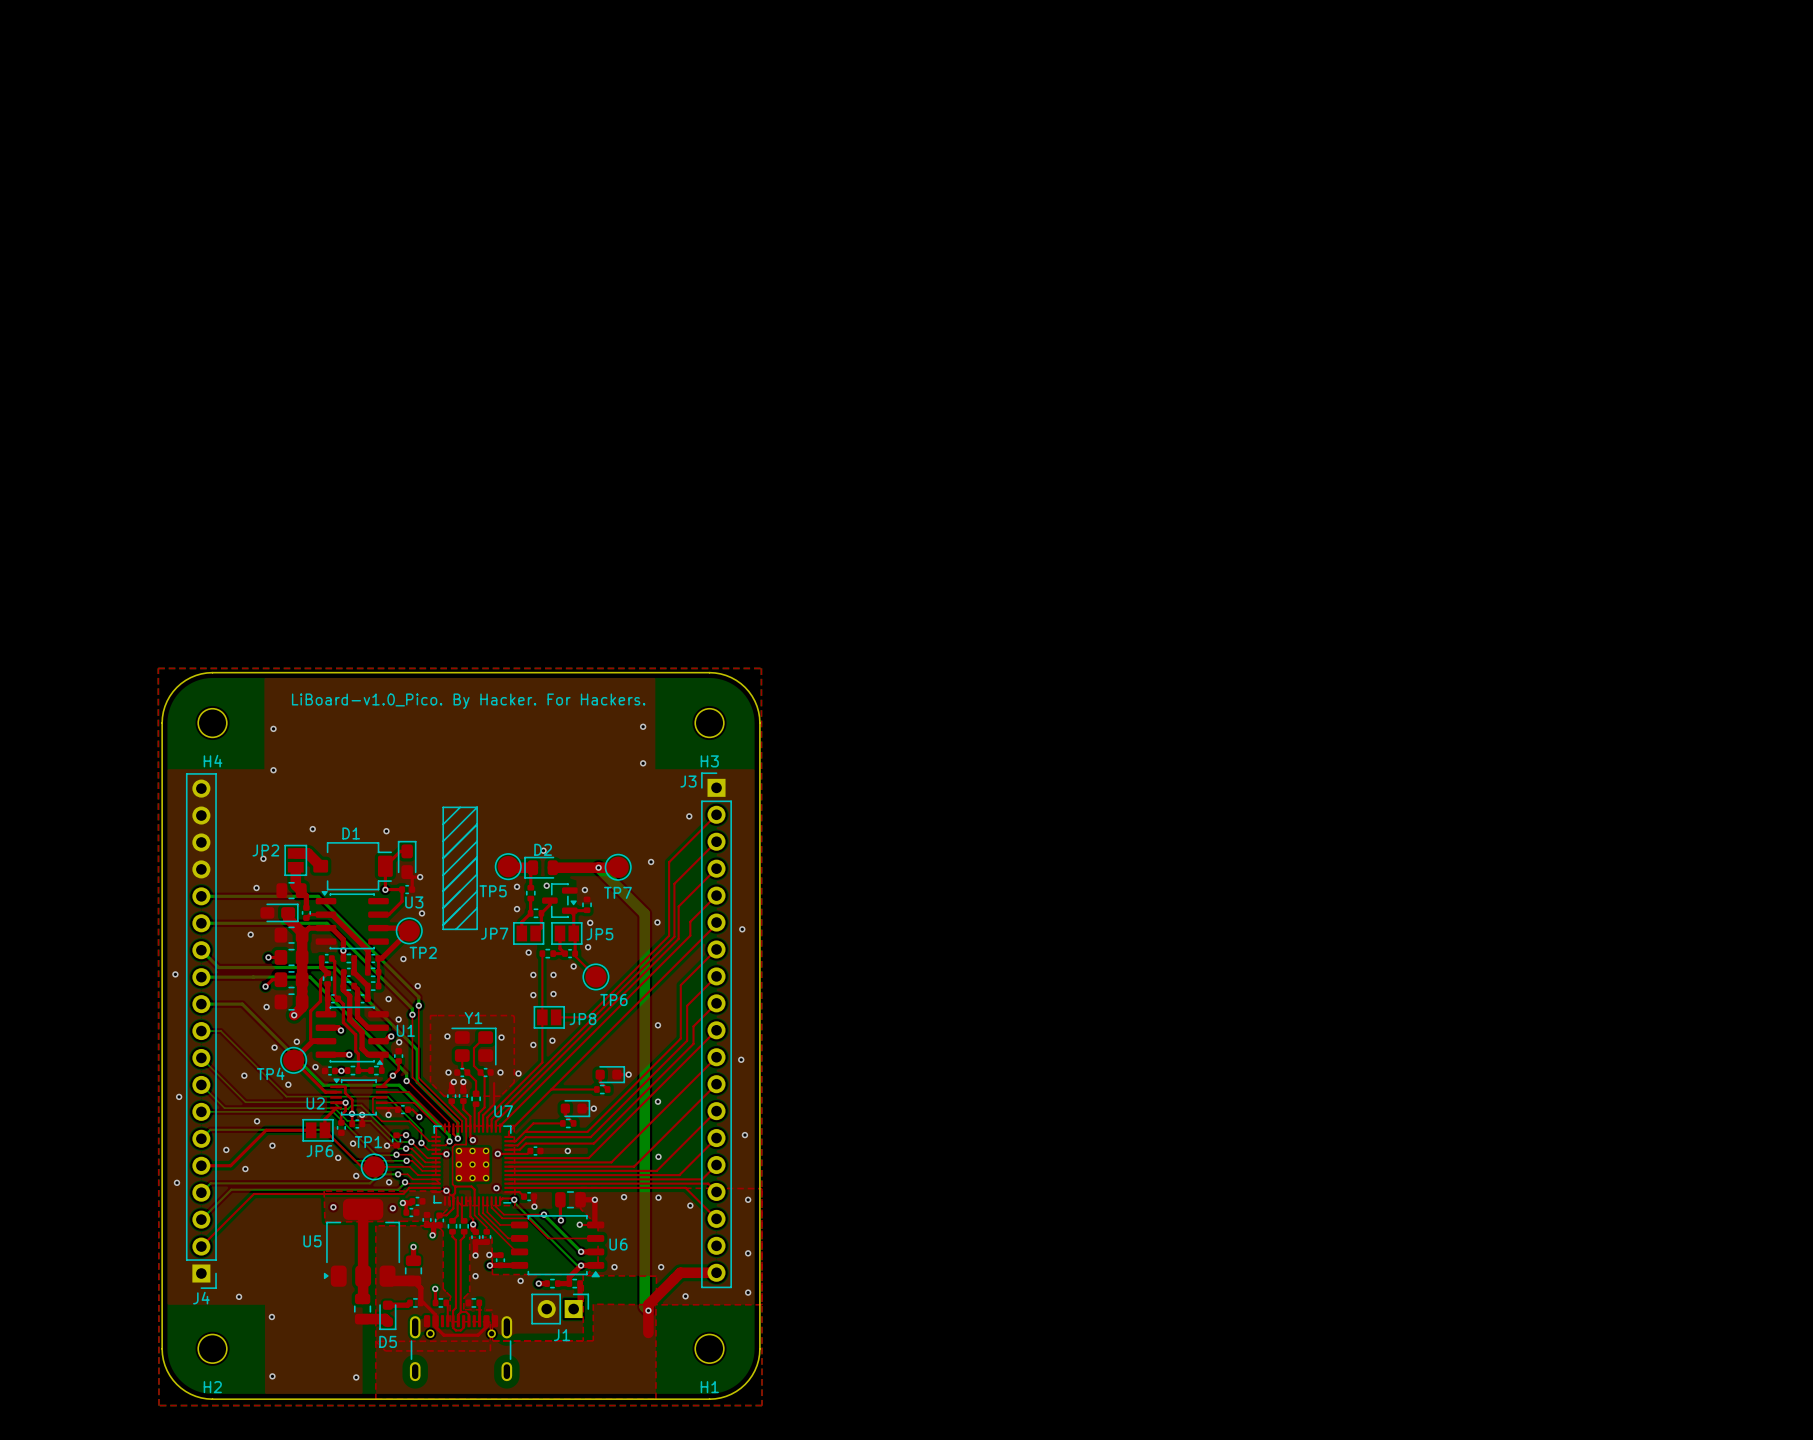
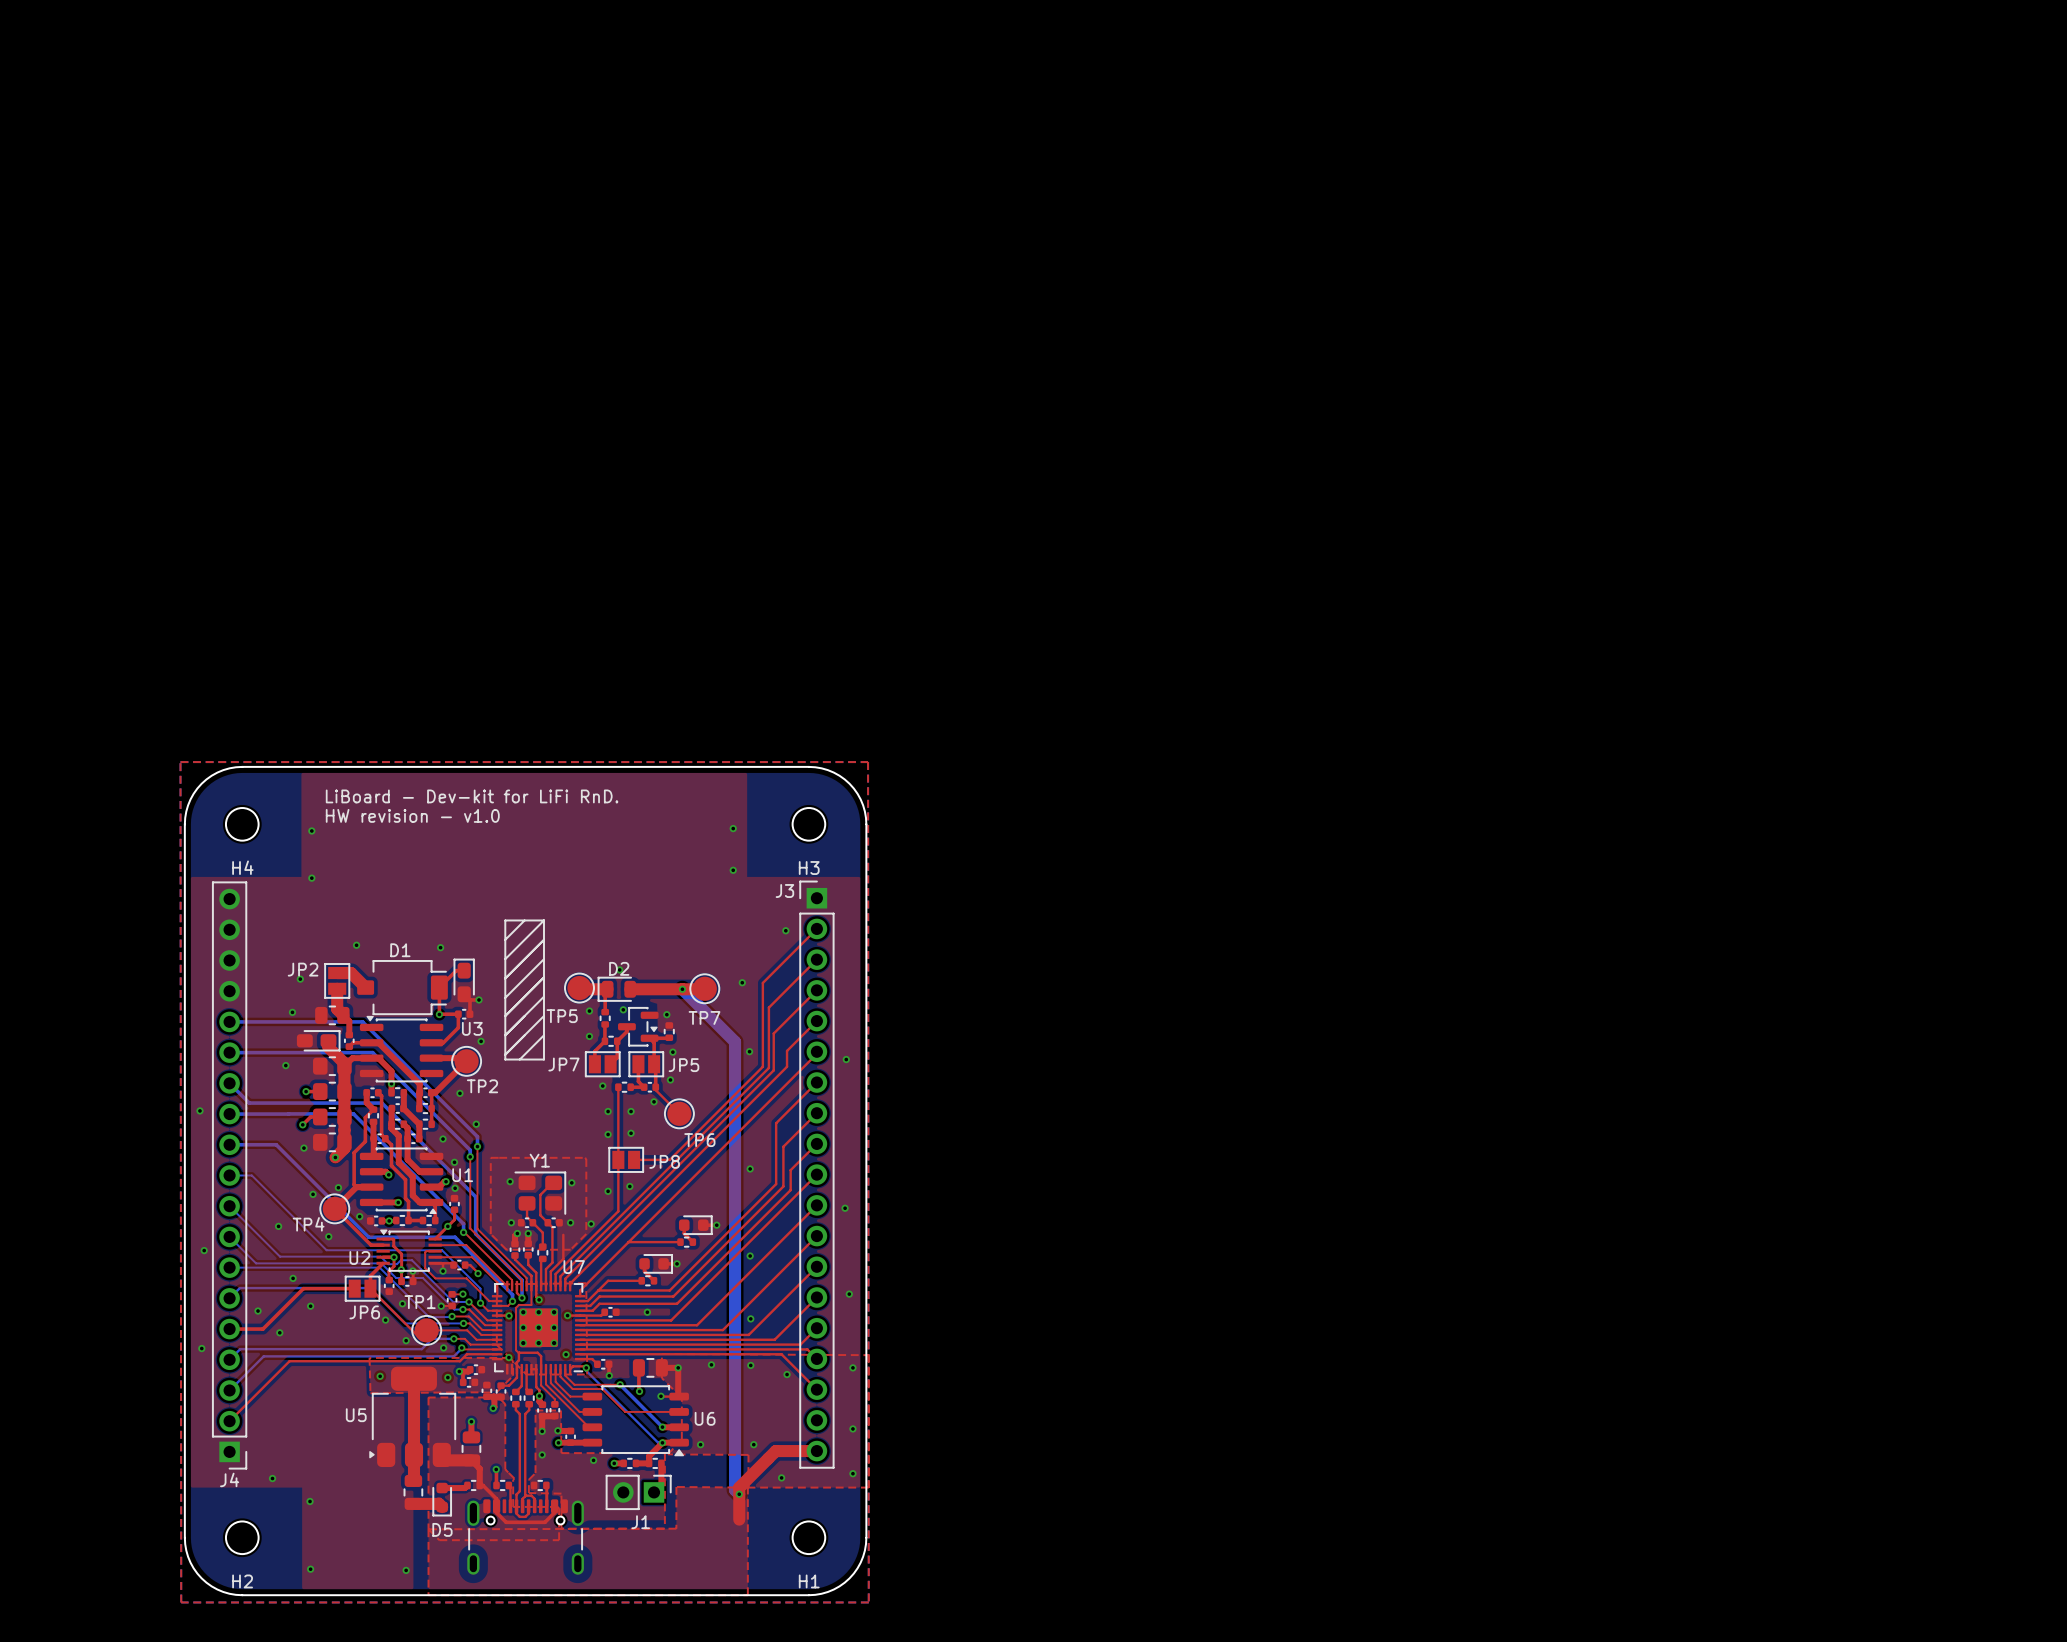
text: LiBoard-v1.0_Pico. By Hacker. For Hackers. (468, 701) -> LiBoard - Dev-kit for LiFi RnD. (472, 796)
text: none -> HW revision - v1.0 (412, 815)

